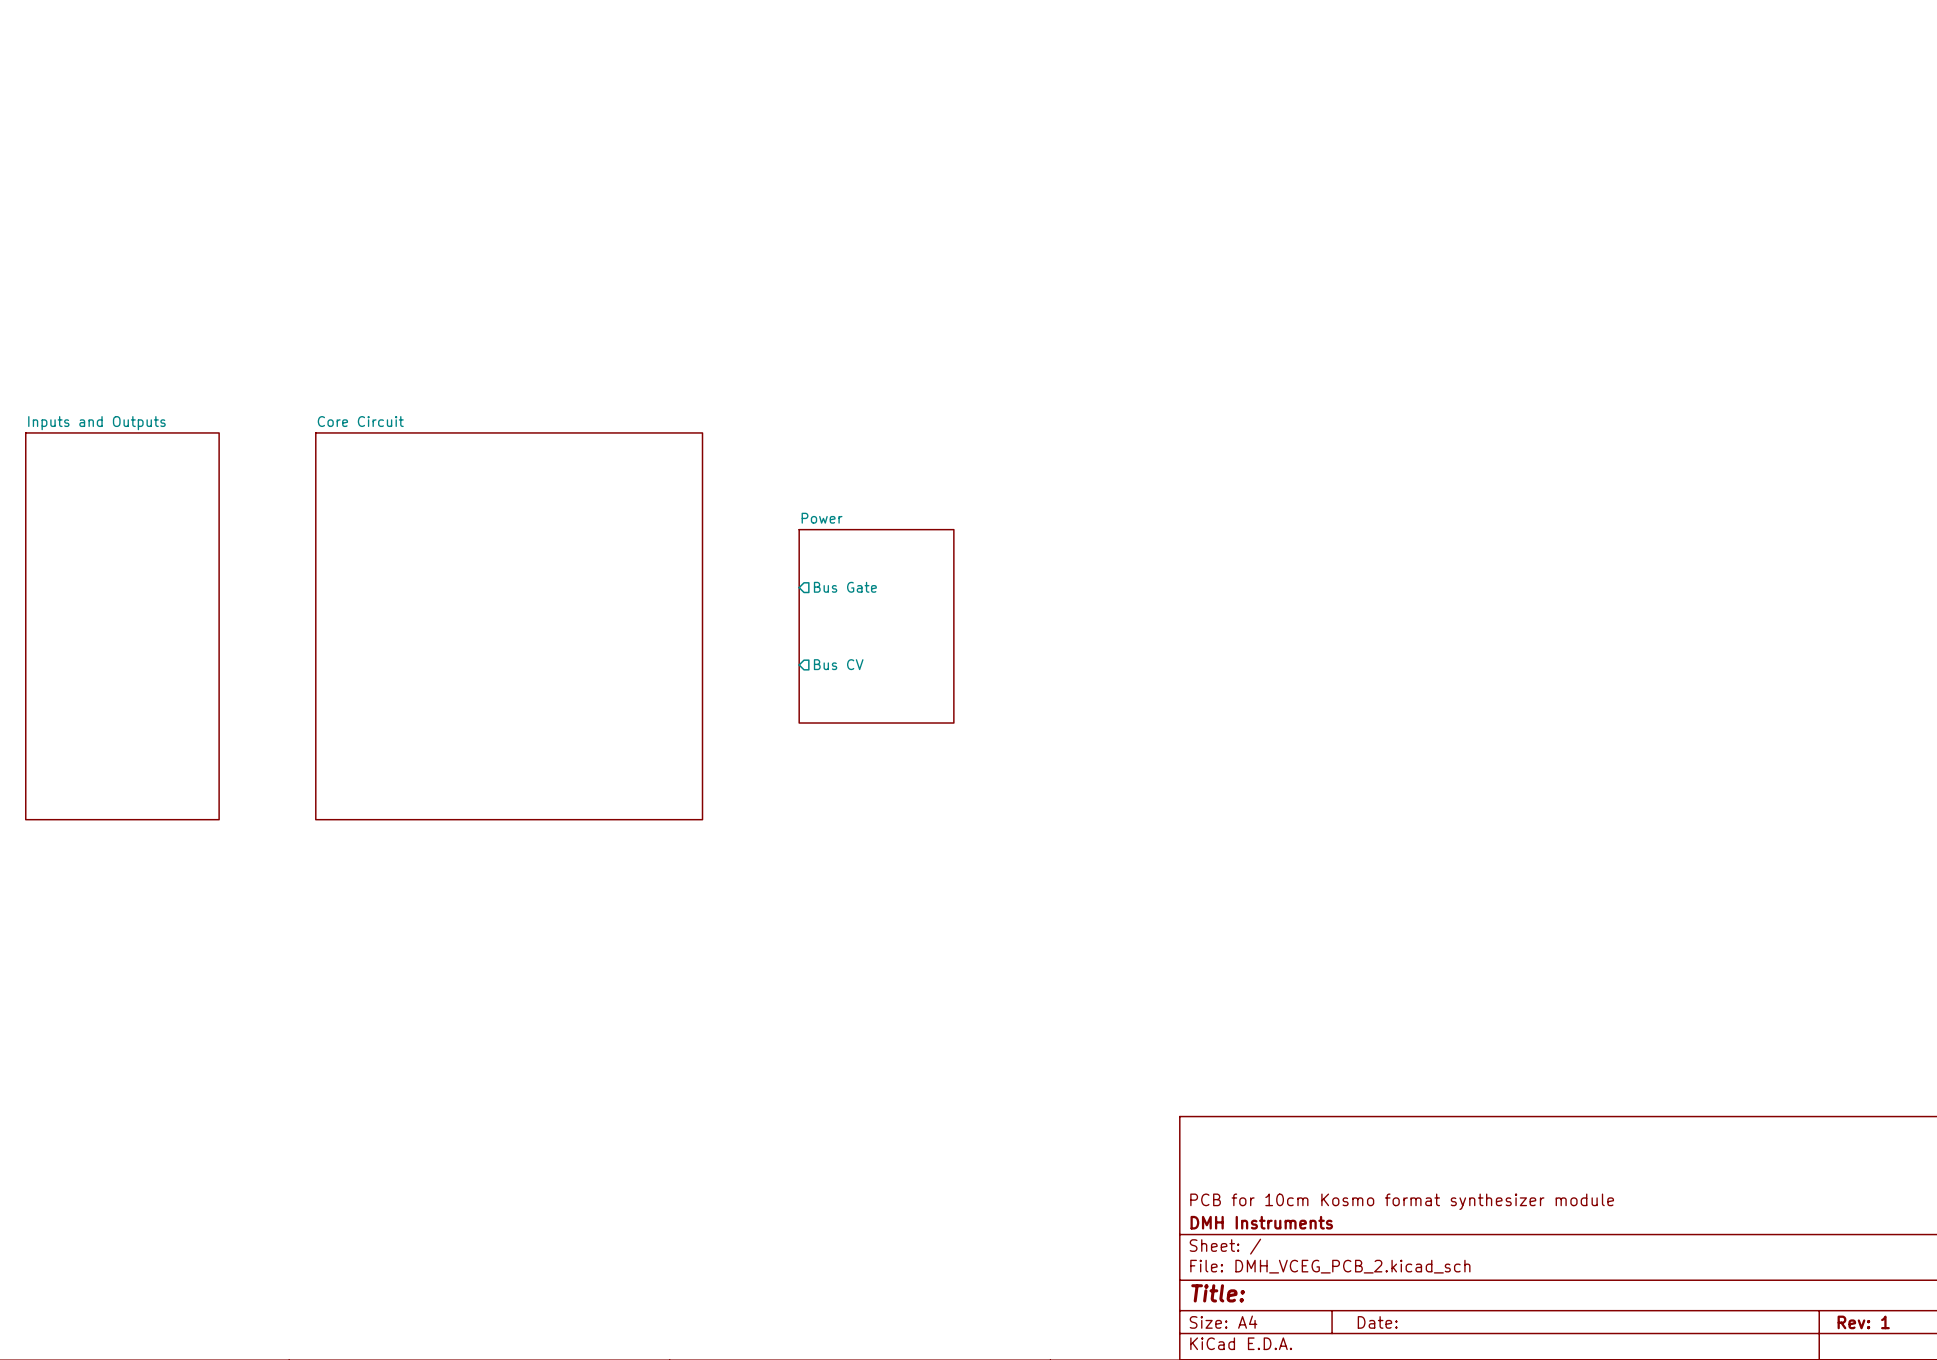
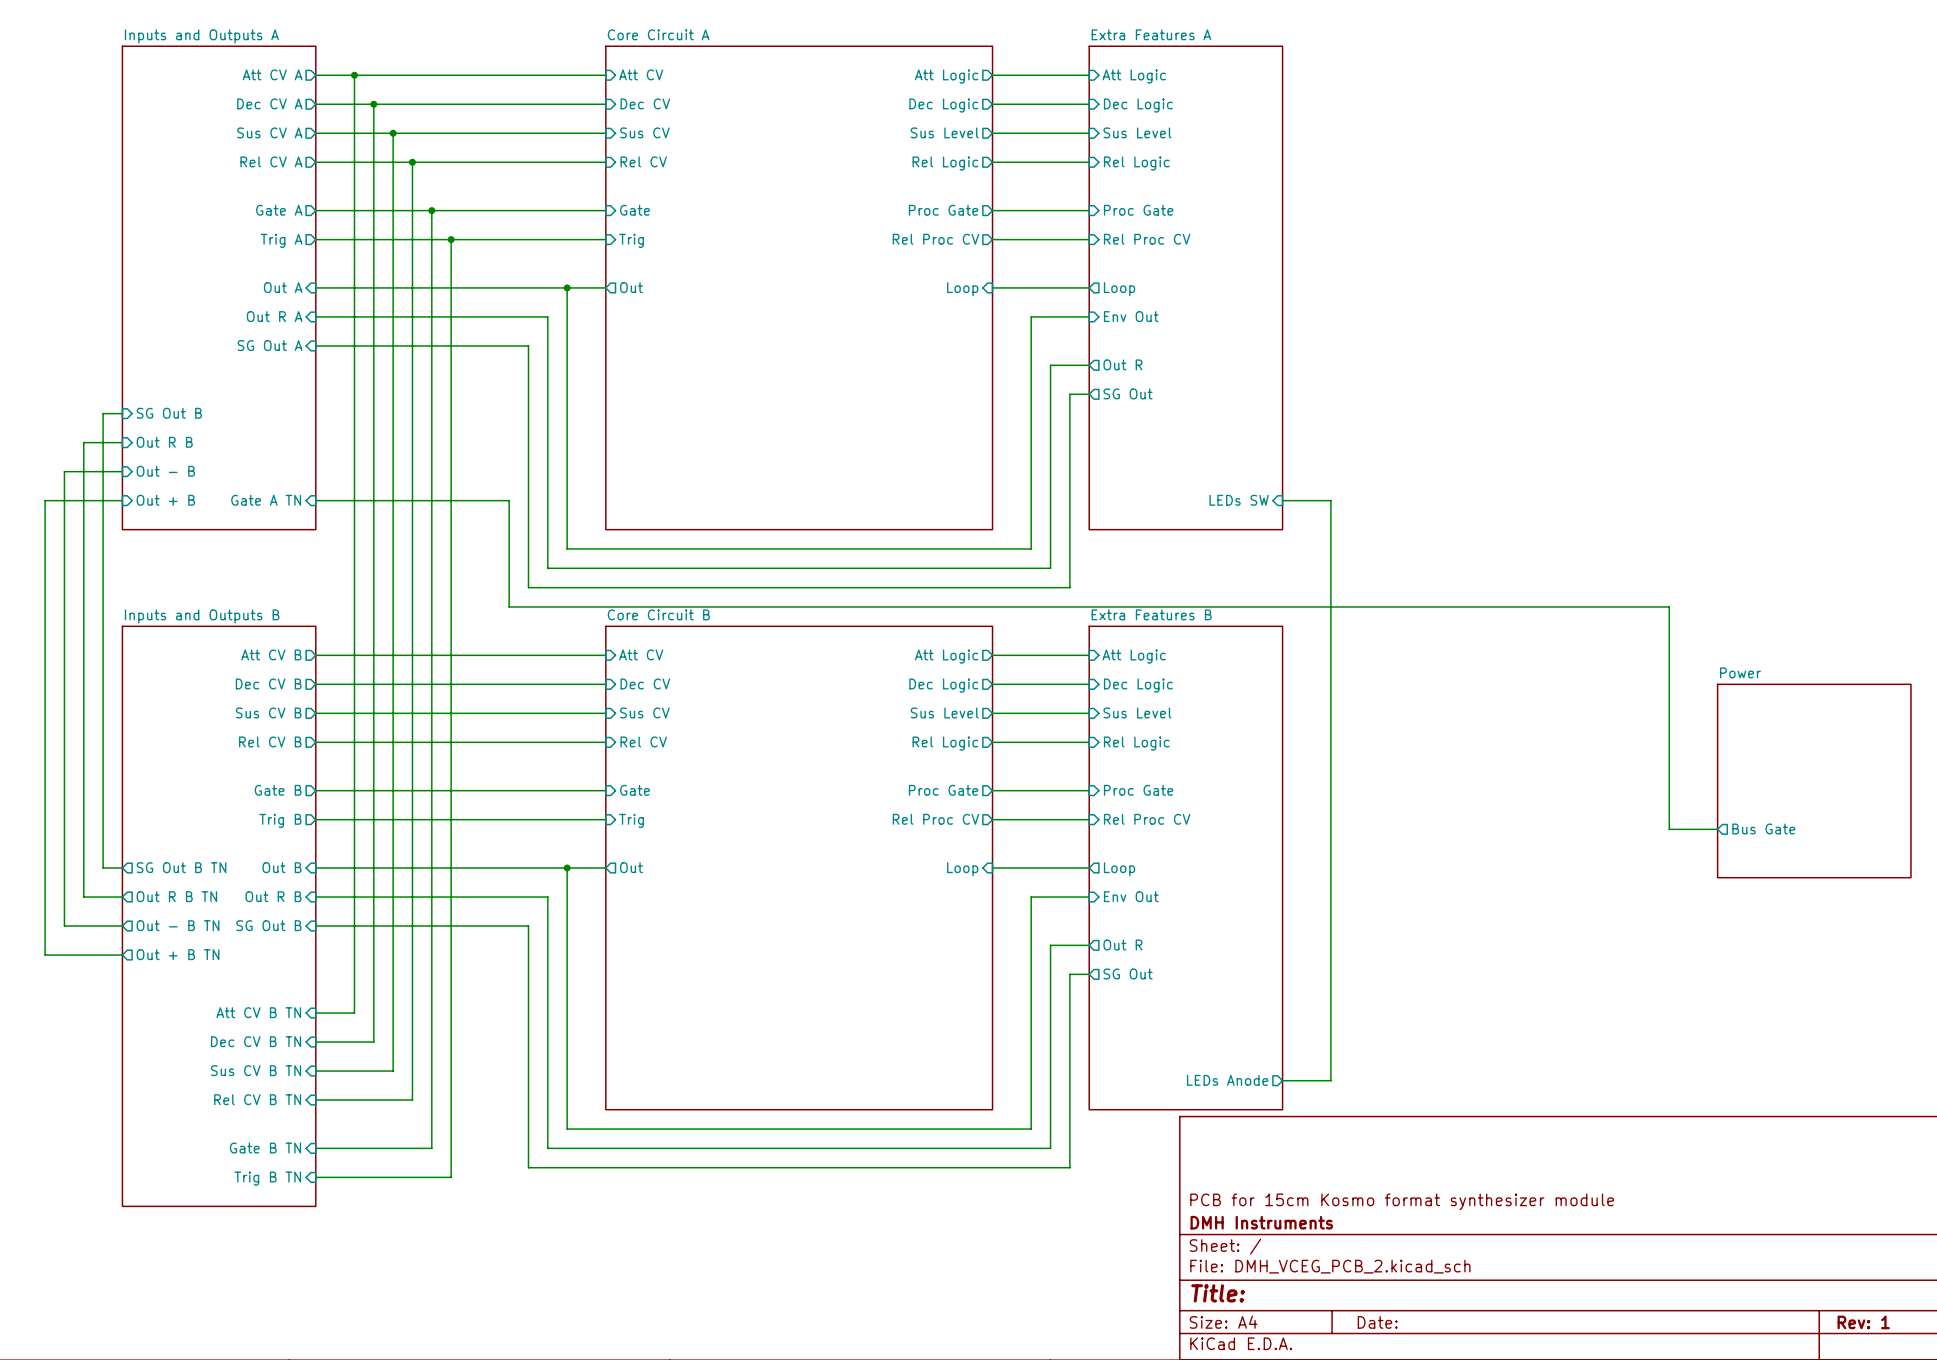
sheet pin: none -> Att CV A (272, 74)
sheet pin: none -> Att CV (641, 74)
wire: none -> (315, 75) (605, 75)
wire: none -> (354, 75) (354, 1013) (315, 1013)
junction: none -> (354, 75)
wire: none -> (992, 75) (1089, 75)
sheet pin: none -> Att Logic (946, 76)
sheet pin: none -> Att Logic (1134, 76)
sheet pin: none -> Dec CV A (269, 103)
sheet pin: none -> Dec CV (645, 103)
wire: none -> (315, 104) (605, 104)
wire: none -> (373, 104) (373, 1042) (315, 1042)
junction: none -> (373, 104)
wire: none -> (992, 104) (1089, 104)
sheet pin: none -> Dec Logic (943, 105)
sheet pin: none -> Dec Logic (1138, 105)
sheet pin: none -> Sus CV A (269, 132)
sheet pin: none -> Sus CV (644, 132)
sheet pin: none -> Sus Level (944, 132)
sheet pin: none -> Sus Level (1137, 132)
wire: none -> (315, 133) (605, 133)
wire: none -> (393, 133) (393, 1071) (315, 1071)
junction: none -> (393, 133)
wire: none -> (992, 133) (1089, 133)
sheet pin: none -> Rel CV A (271, 161)
sheet pin: none -> Rel CV (643, 161)
wire: none -> (315, 162) (605, 162)
wire: none -> (412, 162) (412, 1100) (315, 1100)
junction: none -> (412, 162)
wire: none -> (992, 162) (1089, 162)
sheet pin: none -> Rel Logic (945, 163)
sheet pin: none -> Rel Logic (1136, 163)
sheet pin: none -> Gate A (279, 210)
wire: none -> (315, 210) (605, 210)
wire: none -> (431, 210) (431, 1148) (315, 1148)
junction: none -> (431, 210)
sheet pin: none -> Gate (634, 210)
sheet pin: none -> Proc Gate (943, 210)
wire: none -> (992, 210) (1089, 210)
sheet pin: none -> Proc Gate (1138, 210)
wire: none -> (315, 239) (605, 239)
wire: none -> (451, 239) (451, 1177) (315, 1177)
junction: none -> (451, 239)
sheet pin: none -> Rel Proc CV (935, 239)
wire: none -> (992, 239) (1089, 239)
sheet pin: none -> Rel Proc CV (1147, 239)
sheet pin: none -> Trig A (281, 240)
sheet pin: none -> Trig (631, 240)
sheet Inputs and Outputs A: none -> (219, 287)
sheet pin: none -> Out A (283, 287)
wire: none -> (315, 287) (605, 287)
wire: none -> (567, 287) (567, 548) (1031, 548) (1031, 316) (1089, 316)
junction: none -> (567, 287)
sheet pin: none -> Out (631, 287)
sheet Core Circuit A: none -> (799, 287)
wire: none -> (992, 287) (1089, 287)
sheet Extra Features A: none -> (1185, 287)
sheet pin: none -> Loop (962, 289)
sheet pin: none -> Loop (1119, 289)
sheet pin: none -> Out R A (274, 316)
wire: none -> (315, 316) (547, 316) (547, 568) (1050, 568) (1050, 365) (1089, 365)
sheet pin: none -> Env Out (1131, 316)
sheet pin: none -> SG Out A (270, 345)
wire: none -> (315, 345) (528, 345) (528, 587) (1069, 587) (1069, 394) (1089, 394)
sheet pin: none -> Out R (1122, 364)
sheet pin: none -> SG Out (1128, 393)
wire: none -> (122, 413) (103, 413) (103, 868) (122, 868)
sheet pin: none -> SG Out B (169, 413)
wire: none -> (122, 442) (83, 442) (83, 897) (122, 897)
sheet pin: none -> Out R B (164, 442)
wire: none -> (122, 471) (64, 471) (64, 926) (122, 926)
sheet pin: none -> Out - B (165, 471)
wire: none -> (122, 500) (45, 500) (45, 955) (122, 955)
sheet pin: none -> Out + B (165, 500)
sheet pin: none -> Gate A TN (266, 500)
wire: none -> (315, 500) (509, 500) (509, 606) (1669, 606) (1669, 829) (1717, 829)
sheet pin: none -> LEDs SW (1239, 500)
wire: none -> (1282, 500) (1330, 500) (1330, 1080) (1282, 1080)
sheet pin: Bus Gate (845, 587) -> none
sheet Inputs and Outputs: (122, 626) -> none
sheet Core Circuit: (509, 626) -> none
sheet Power: (876, 626) -> none
sheet pin: none -> Att CV B (271, 654)
sheet pin: none -> Att CV (641, 654)
wire: none -> (315, 655) (605, 655)
wire: none -> (992, 655) (1089, 655)
sheet pin: none -> Att Logic (946, 656)
sheet pin: none -> Att Logic (1134, 656)
sheet pin: Bus CV (838, 664) -> none
sheet pin: none -> Dec CV B (268, 683)
sheet pin: none -> Dec CV (645, 683)
wire: none -> (315, 684) (605, 684)
wire: none -> (992, 684) (1089, 684)
sheet pin: none -> Dec Logic (943, 685)
sheet pin: none -> Dec Logic (1138, 685)
sheet pin: none -> Sus CV B (268, 712)
sheet pin: none -> Sus CV (644, 712)
sheet pin: none -> Sus Level (944, 712)
sheet pin: none -> Sus Level (1137, 712)
wire: none -> (315, 713) (605, 713)
wire: none -> (992, 713) (1089, 713)
sheet pin: none -> Rel CV B (270, 741)
sheet pin: none -> Rel CV (643, 741)
wire: none -> (315, 742) (605, 742)
wire: none -> (992, 742) (1089, 742)
sheet pin: none -> Rel Logic (945, 743)
sheet pin: none -> Rel Logic (1136, 743)
sheet Power: none -> (1814, 781)
sheet pin: none -> Gate B (278, 790)
wire: none -> (315, 790) (605, 790)
sheet pin: none -> Gate (634, 790)
sheet pin: none -> Proc Gate (943, 790)
wire: none -> (992, 790) (1089, 790)
sheet pin: none -> Proc Gate (1138, 790)
sheet pin: none -> Rel Proc CV (935, 819)
wire: none -> (992, 819) (1089, 819)
sheet pin: none -> Rel Proc CV (1147, 819)
sheet pin: none -> Trig B (280, 820)
sheet pin: none -> Trig (631, 820)
sheet pin: none -> Bus Gate (1763, 828)
sheet pin: none -> SG Out B TN (181, 867)
sheet pin: none -> Out B (282, 867)
sheet pin: none -> Out (631, 867)
wire: none -> (315, 868) (605, 868)
wire: none -> (567, 868) (567, 1129) (1031, 1129) (1031, 897) (1089, 897)
junction: none -> (567, 868)
sheet Core Circuit B: none -> (799, 868)
wire: none -> (992, 868) (1089, 868)
sheet Extra Features B: none -> (1185, 868)
sheet pin: none -> Loop (962, 869)
sheet pin: none -> Loop (1119, 869)
sheet pin: none -> Out R B TN (176, 896)
sheet pin: none -> Out R B (273, 896)
sheet pin: none -> Env Out (1131, 896)
wire: none -> (315, 897) (547, 897) (547, 1148) (1050, 1148) (1050, 945) (1089, 945)
sheet Inputs and Outputs B: none -> (219, 916)
sheet pin: none -> Out - B TN (178, 925)
sheet pin: none -> SG Out B (268, 925)
wire: none -> (315, 926) (528, 926) (528, 1167) (1069, 1167) (1069, 974) (1089, 974)
sheet pin: none -> Out R (1122, 945)
sheet pin: none -> Out + B TN (178, 954)
sheet pin: none -> SG Out (1128, 974)
sheet pin: none -> Att CV B TN (258, 1012)
sheet pin: none -> Dec CV B TN (256, 1041)
sheet pin: none -> Sus CV B TN (256, 1070)
sheet pin: none -> LEDs Anode (1227, 1080)
sheet pin: none -> Rel CV B TN (257, 1099)
sheet pin: none -> Gate B TN (265, 1148)
sheet pin: none -> Trig B TN (267, 1178)
title block: PCB for 10cm Kosmo format synthesizer module (1402, 1201) -> PCB for 15cm Kosmo format synthesizer module (1402, 1201)

